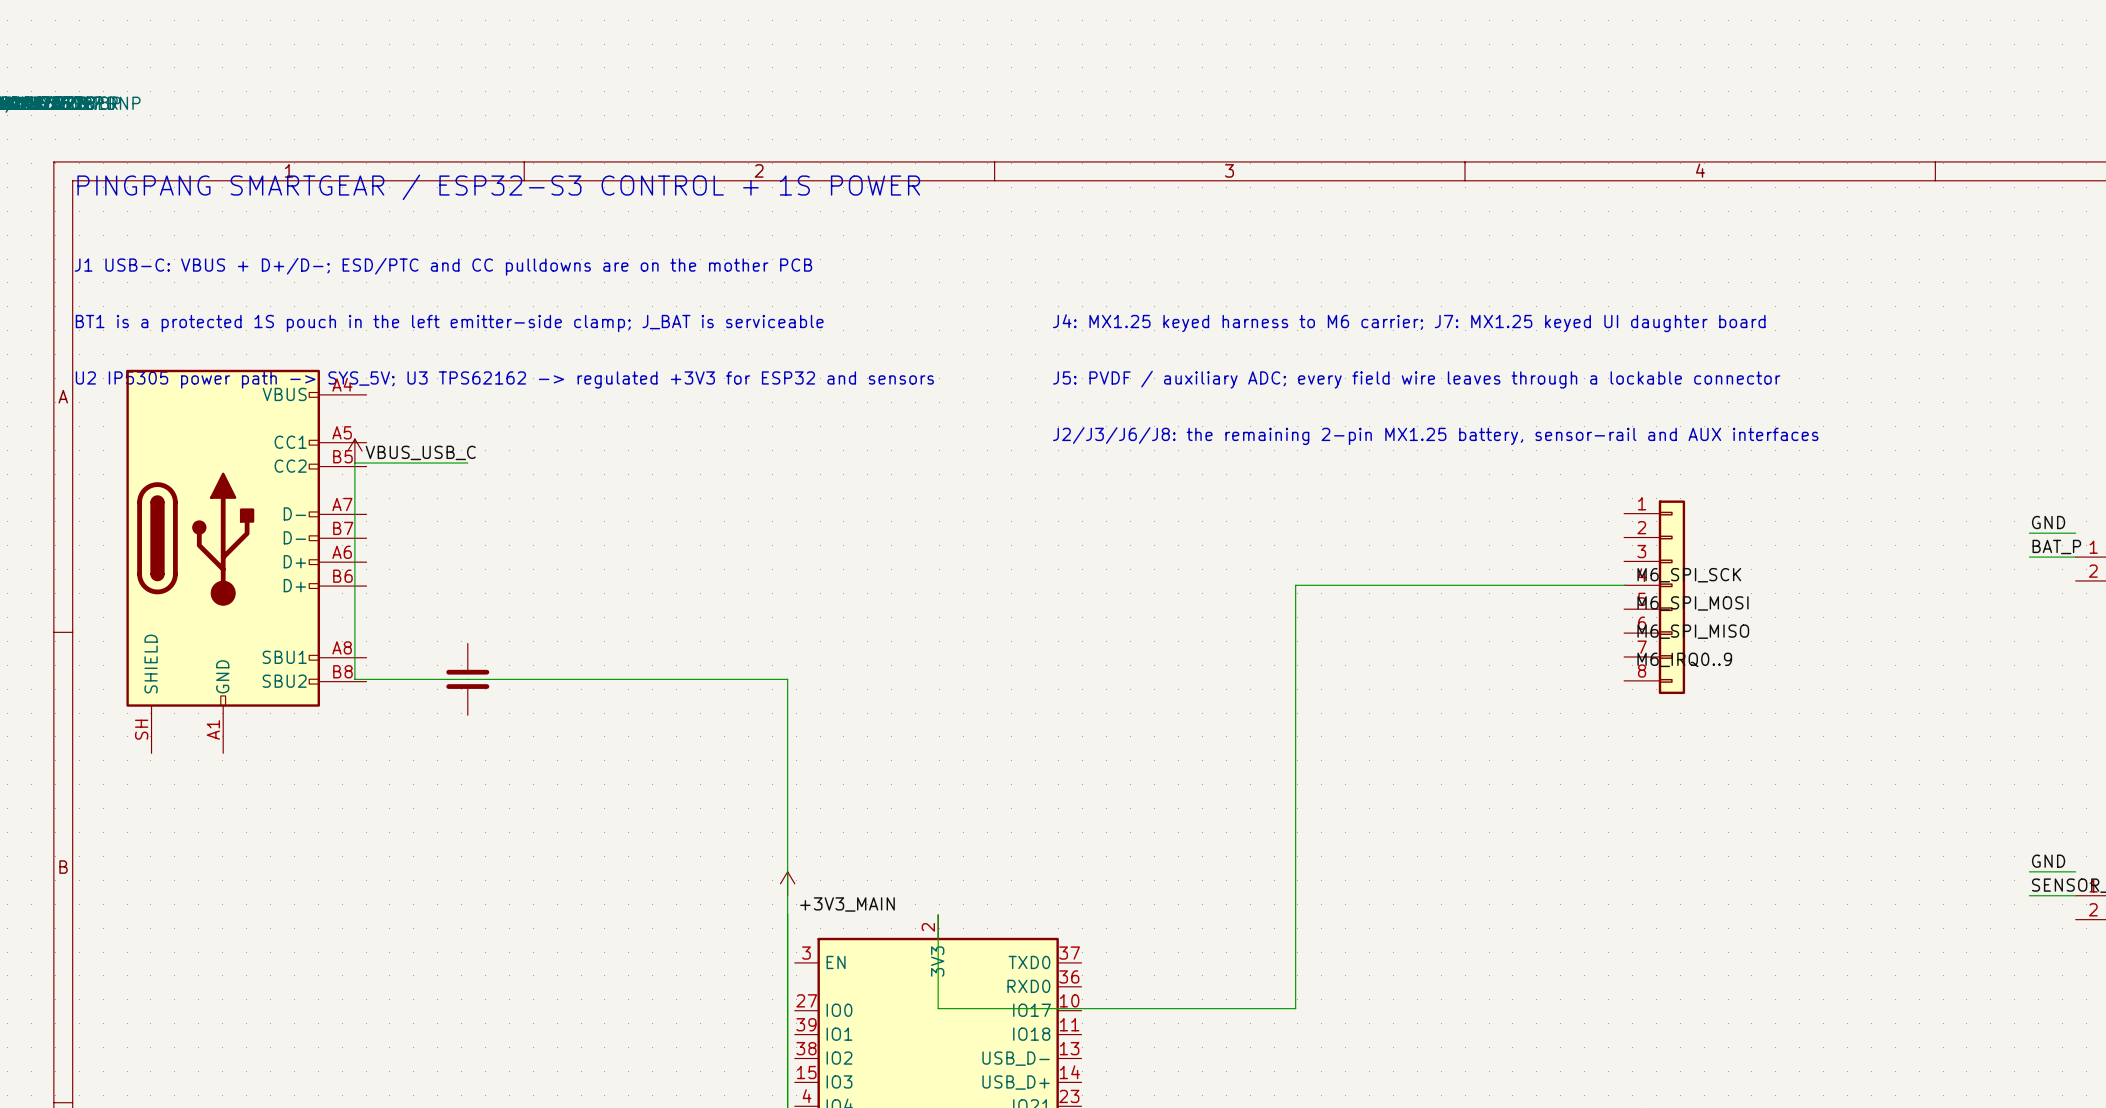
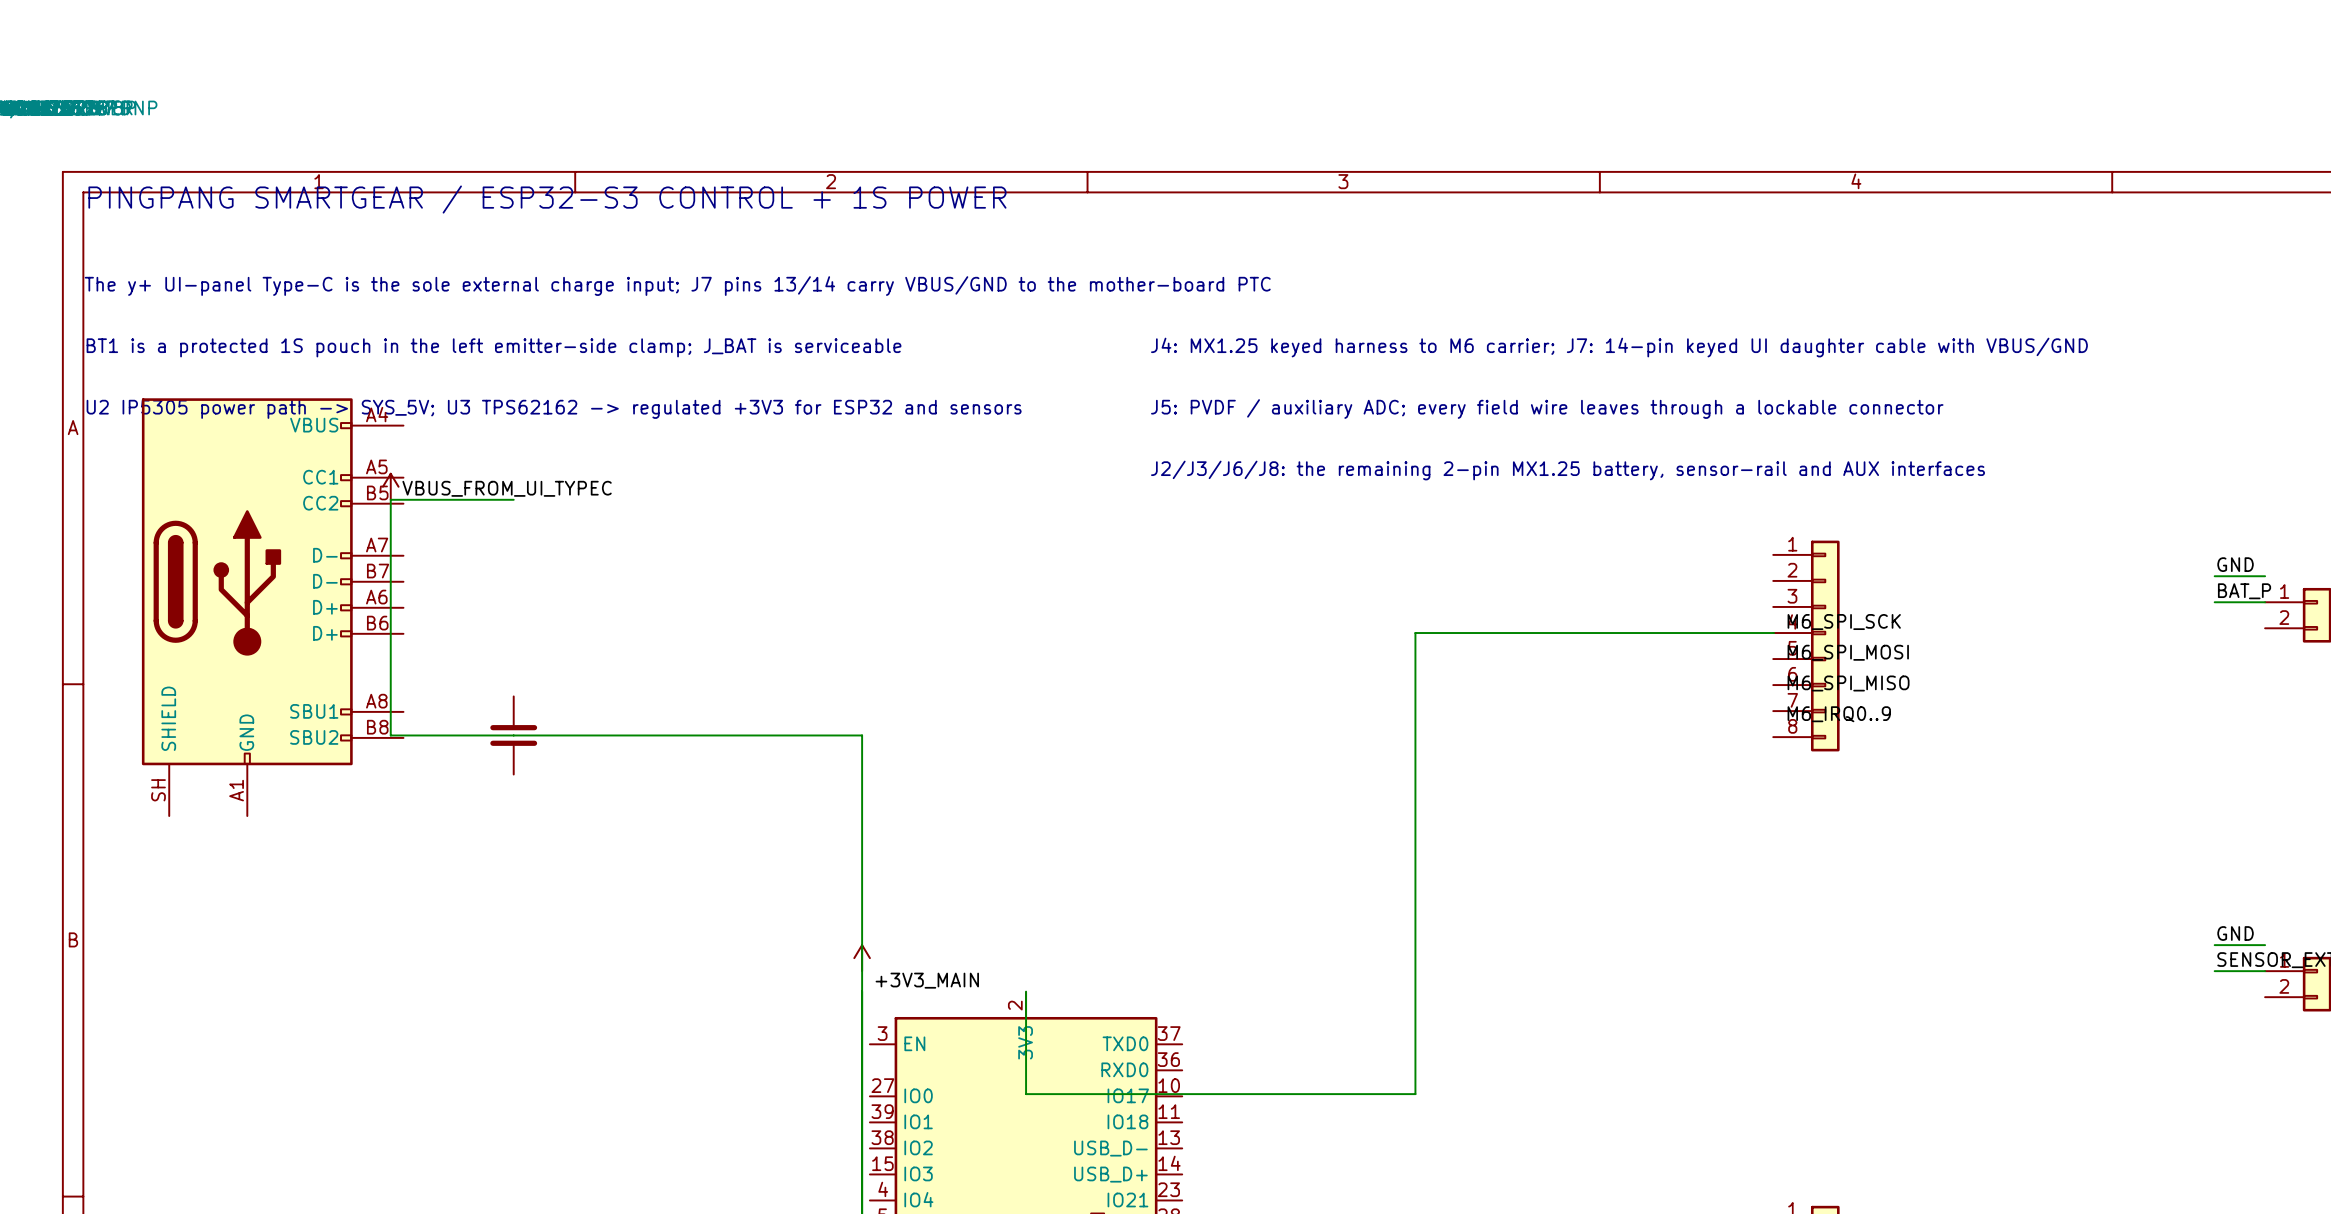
text: J1 USB-C: VBUS + D+/D-; ESD/PTC and CC pulldowns are on the mother PCB (443, 266) -> The y+ UI-panel Type-C is the sole external charge input; J7 pins 13/14 carry VBUS/GND to the mother-board PTC (677, 286)
text: J4: MX1.25 keyed harness to M6 carrier; J7: MX1.25 keyed UI daughter board (1409, 323) -> J4: MX1.25 keyed harness to M6 carrier; J7: 14-pin keyed UI daughter cable with VBUS/GND (1619, 347)
label: VBUS_USB_C (420, 452) -> VBUS_FROM_UI_TYPEC (507, 488)

